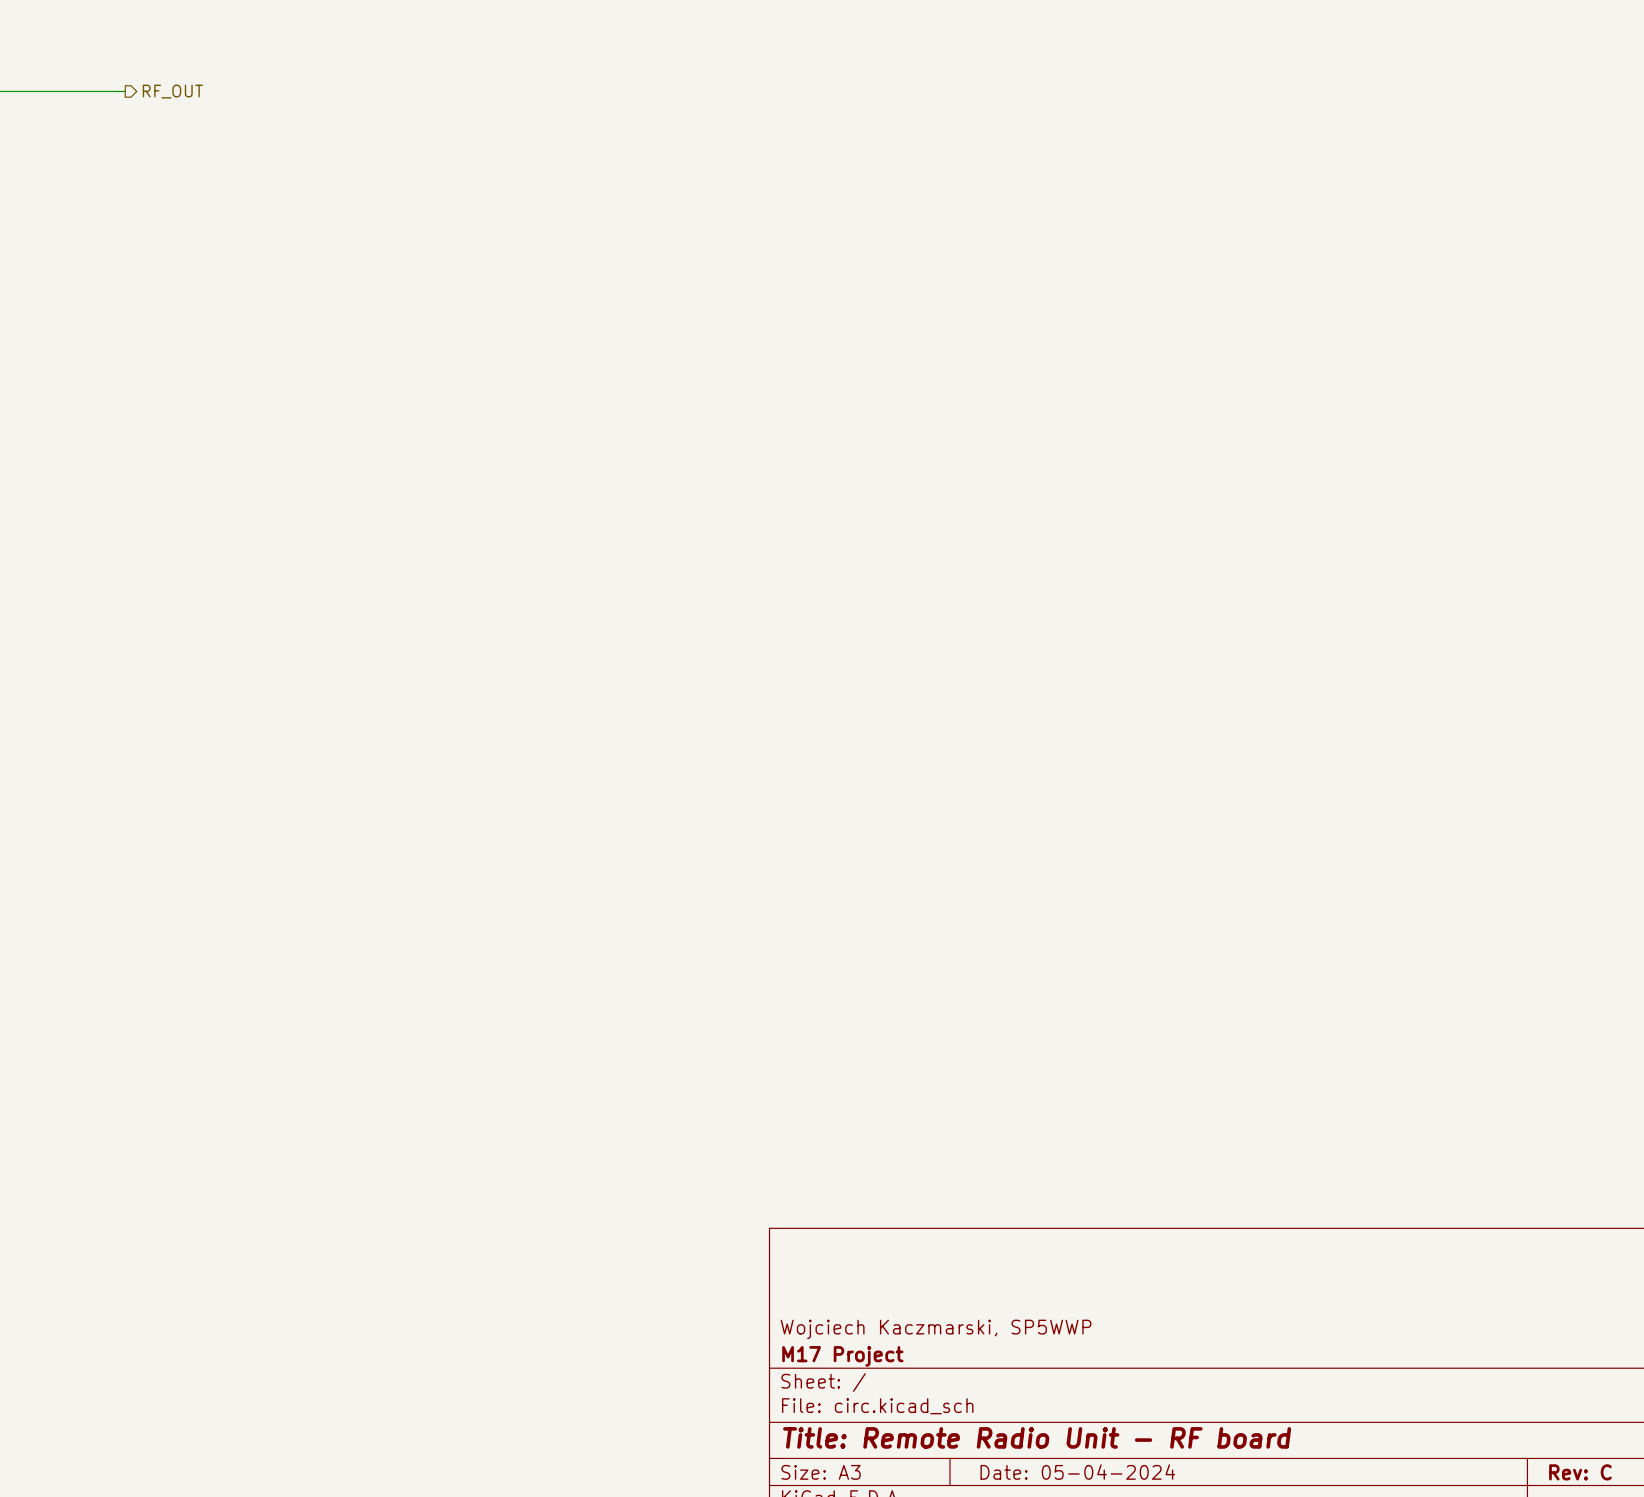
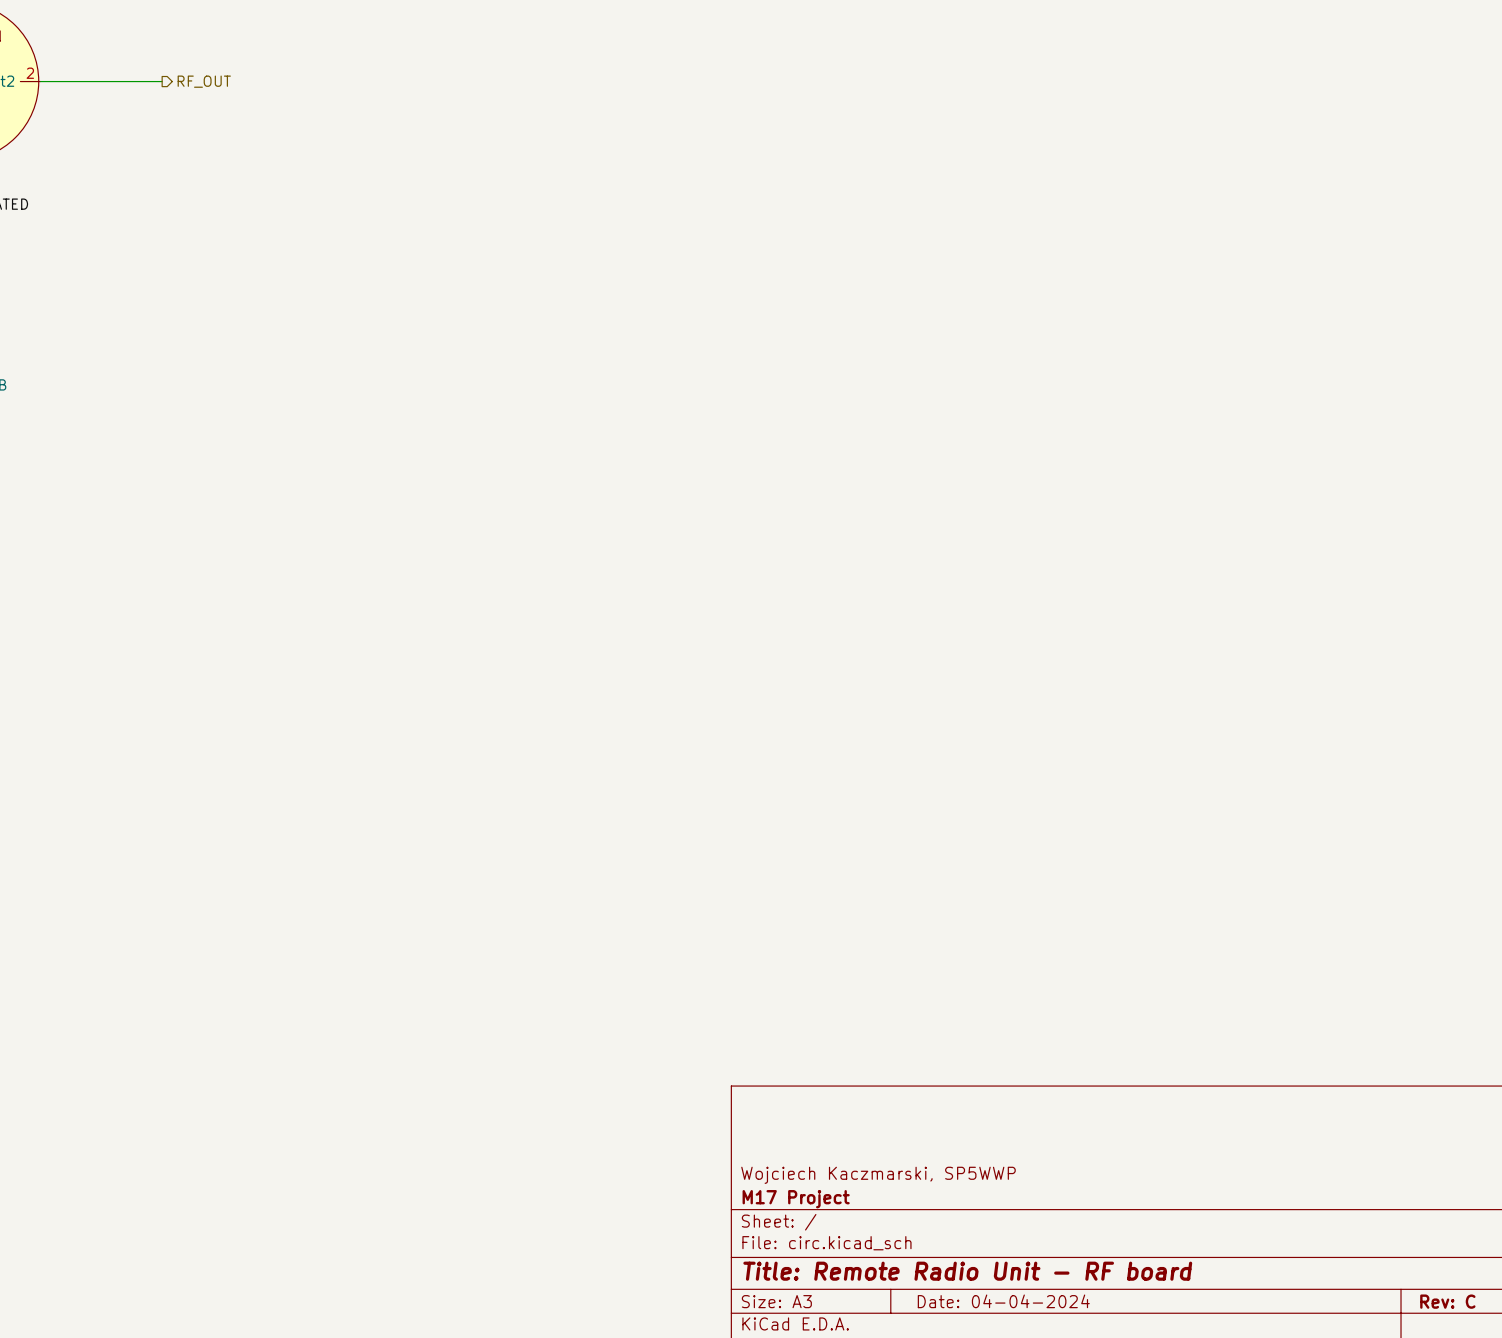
title block: Date: 05-04-2024 (1077, 1472) -> Date: 04-04-2024 (1003, 1301)

